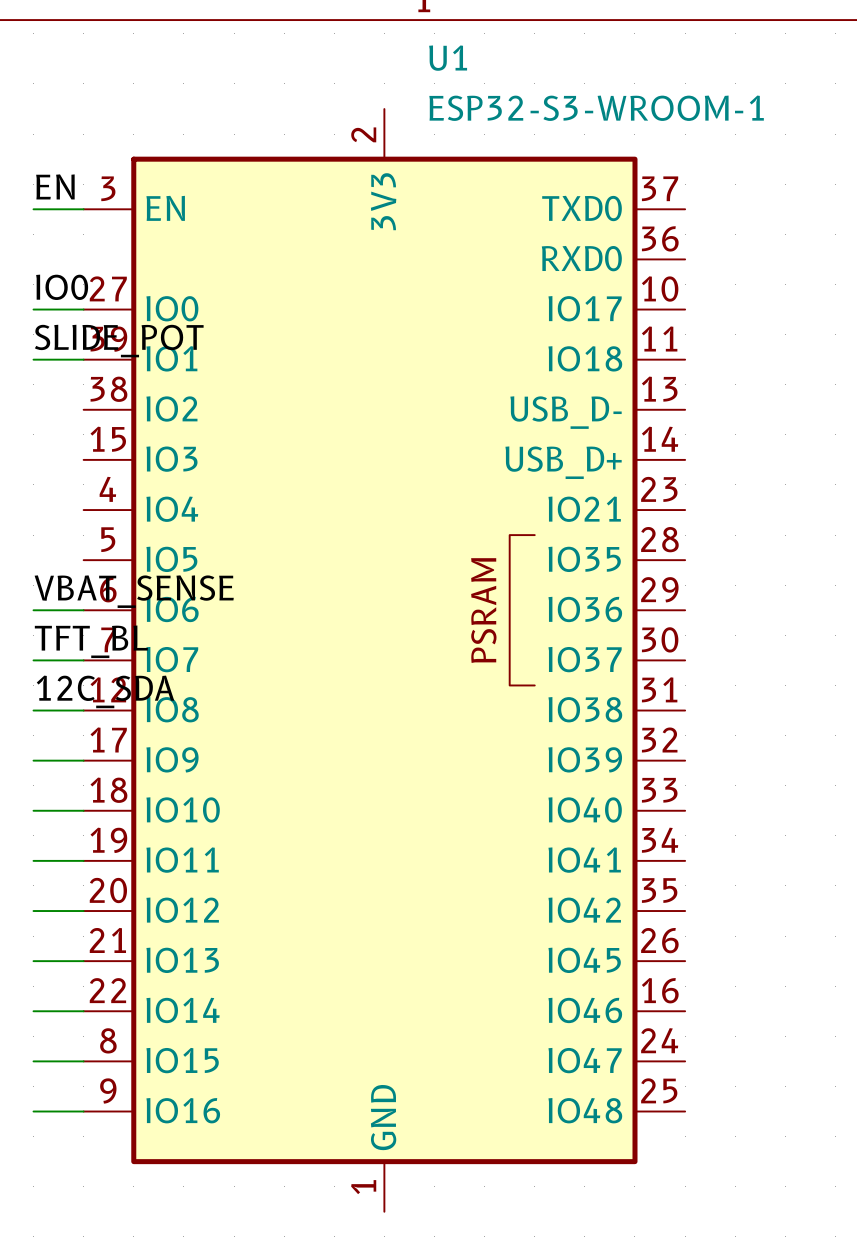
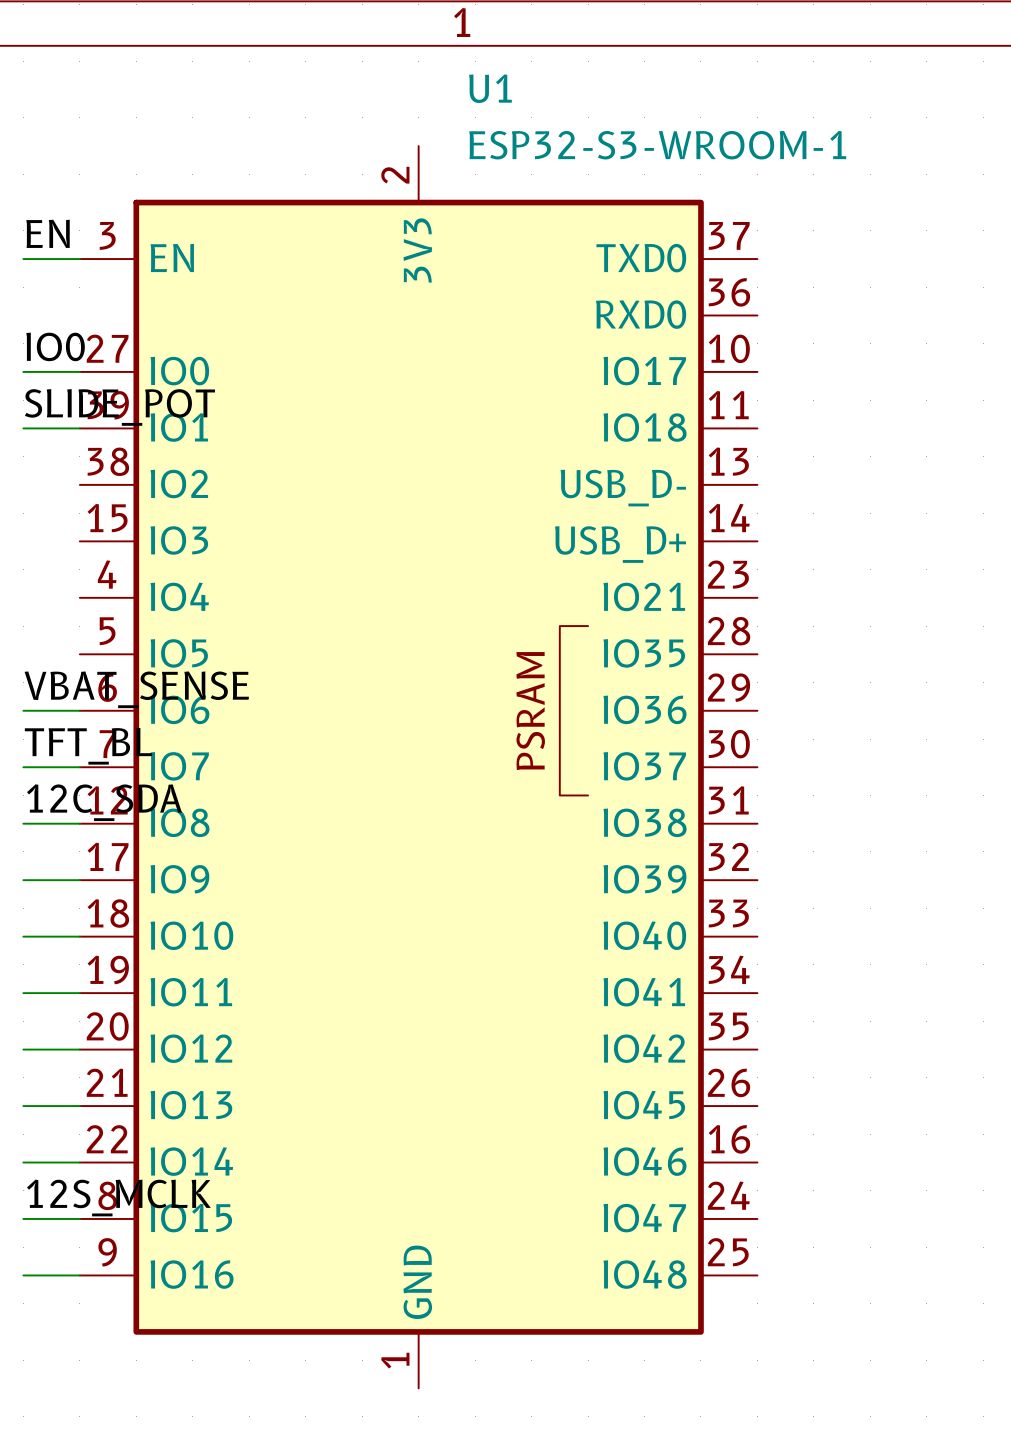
label: none -> 12S_MCLK (118, 1198)

